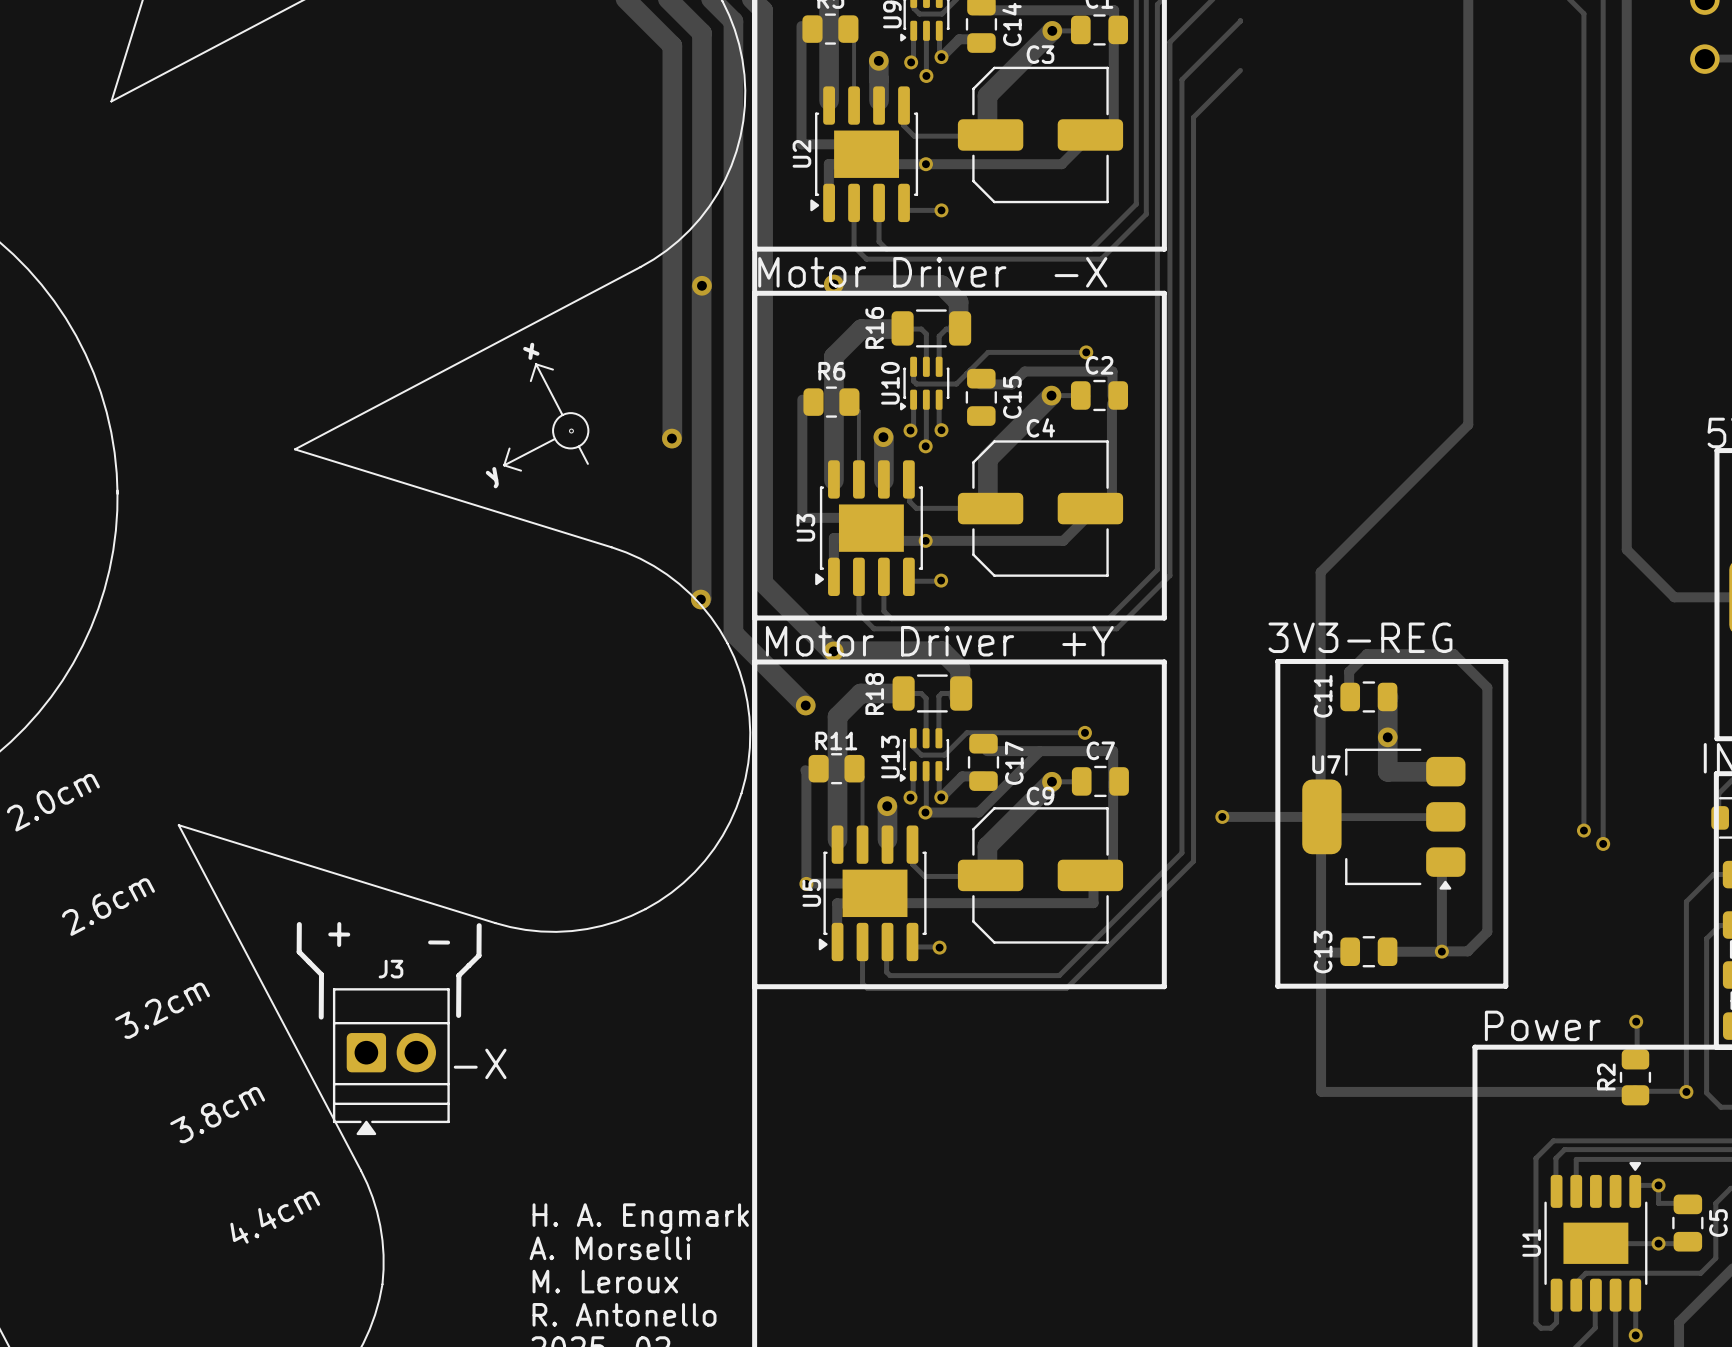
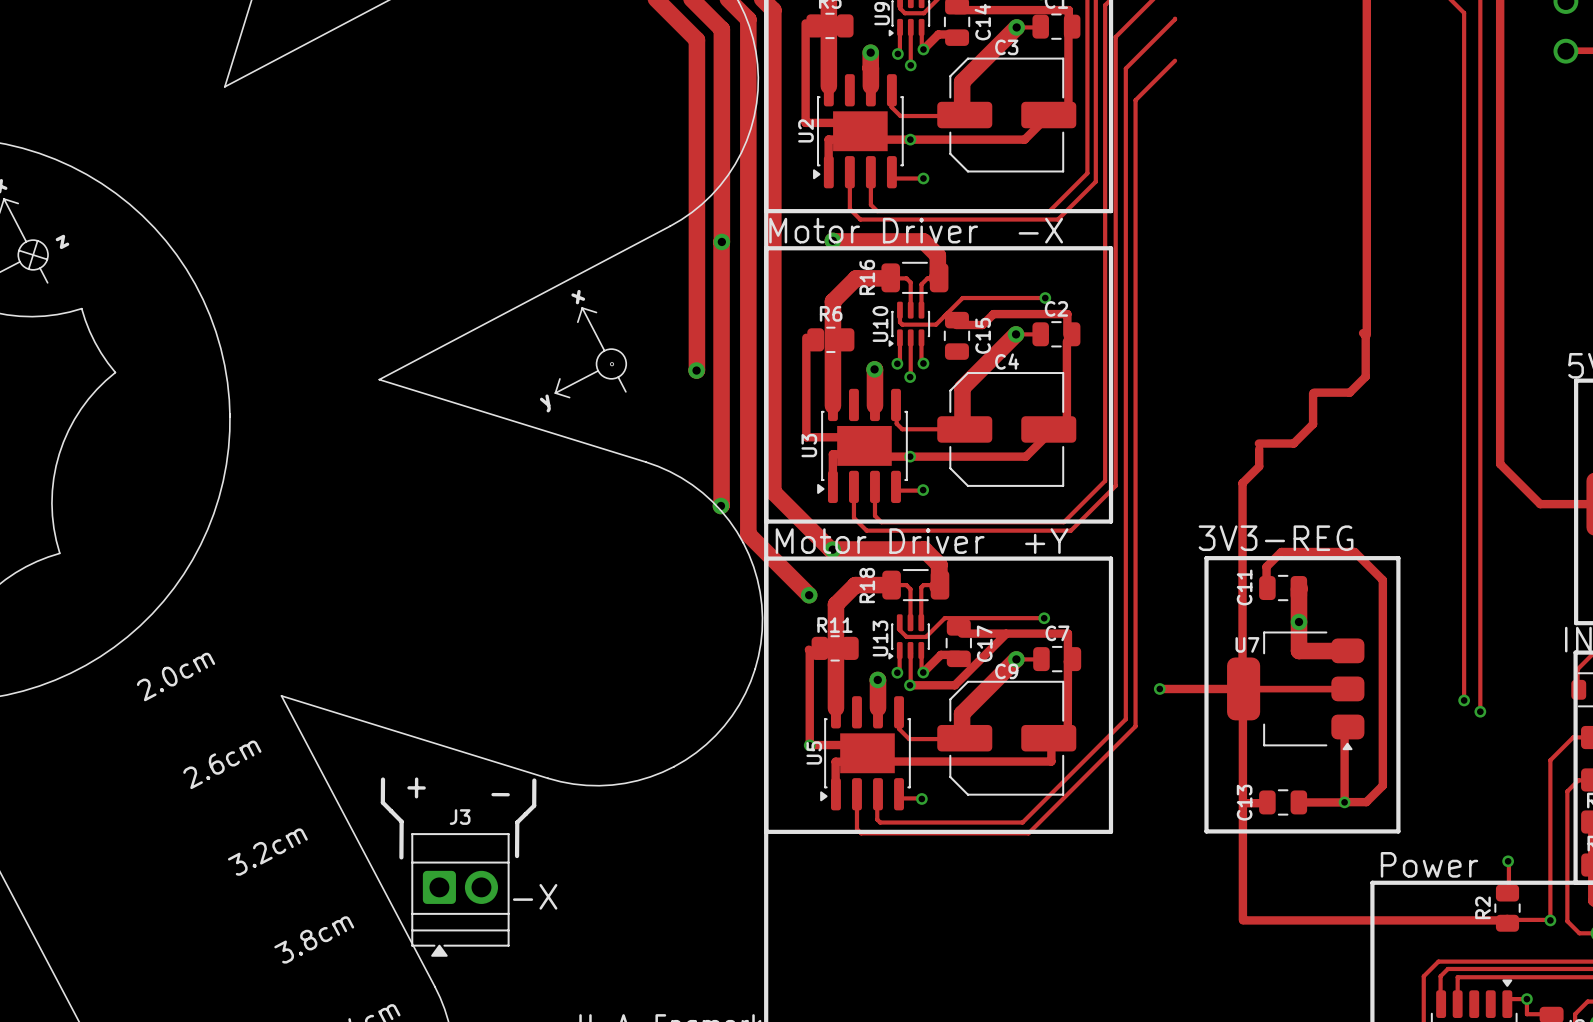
track: (848, 29) (854, 34) (854, 105) -> none
track: none -> (1363, 333) (1365, 335) (1365, 376) (1349, 392) (1314, 392)
track: (1468, 396) (1468, 424) (1320, 572) -> (1259, 449) (1259, 466) (1242, 483)
track: (849, 402) (858, 411) (858, 479) -> none
track: none -> (1313, 393) (1313, 424) (1293, 443) (1258, 443)
track: (854, 768) (862, 776) (862, 844) -> none

